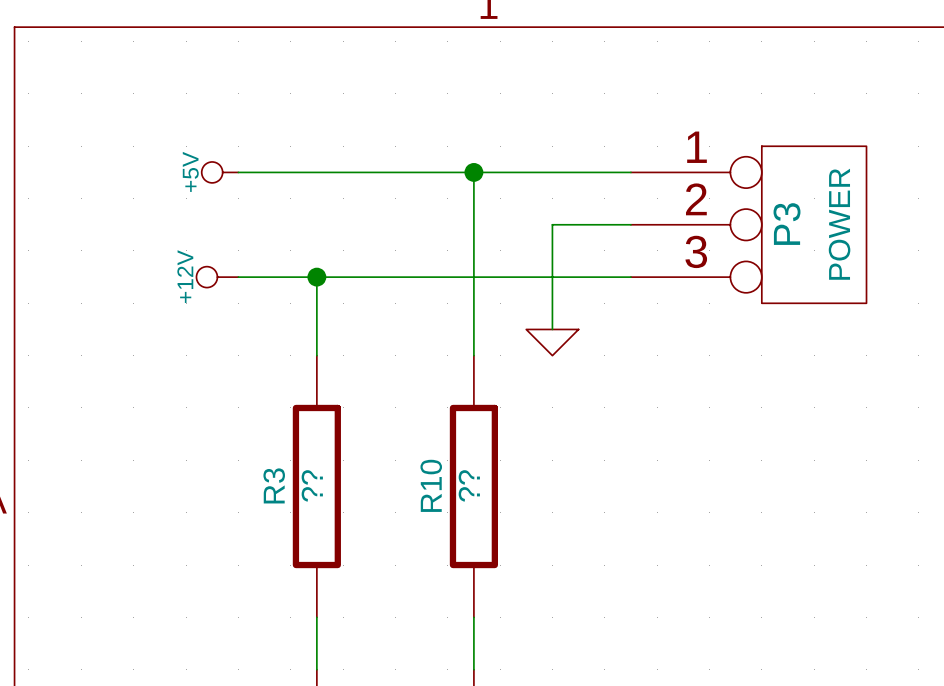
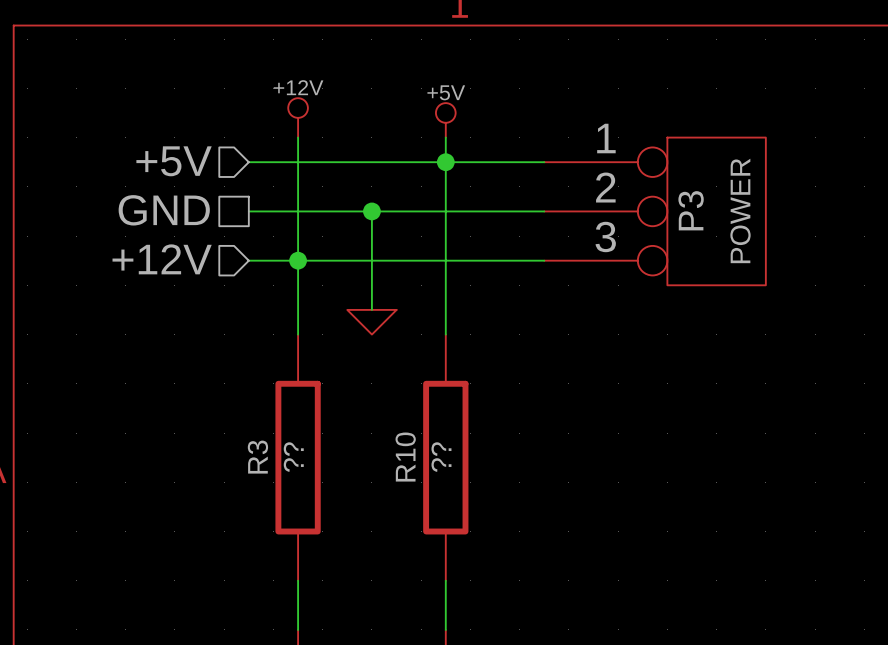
wire: none -> (298, 137) (298, 260)
wire: none -> (445, 137) (445, 162)
hierarchical label: none -> +5V (174, 161)
power symbol rotation: 0° (220, 172) -> 90° clockwise (445, 120)
power symbol position: +5V (220, 172) -> +5V (445, 120)
wire: (238, 172) (264, 172) -> none
hierarchical label: none -> GND (164, 210)
wire: none -> (371, 211) (371, 309)
junction: none -> (371, 211)
wire: (552, 224) (552, 329) -> (519, 211) (248, 211)
P3 position: (748, 224) -> (655, 211)
hierarchical label: none -> +12V (162, 259)
power symbol rotation: 0° (217, 277) -> 90° clockwise (298, 117)
power symbol position: +12V (217, 277) -> +12V (298, 117)
wire: (238, 277) (264, 277) -> none
power symbol position: (552, 342) -> (371, 322)

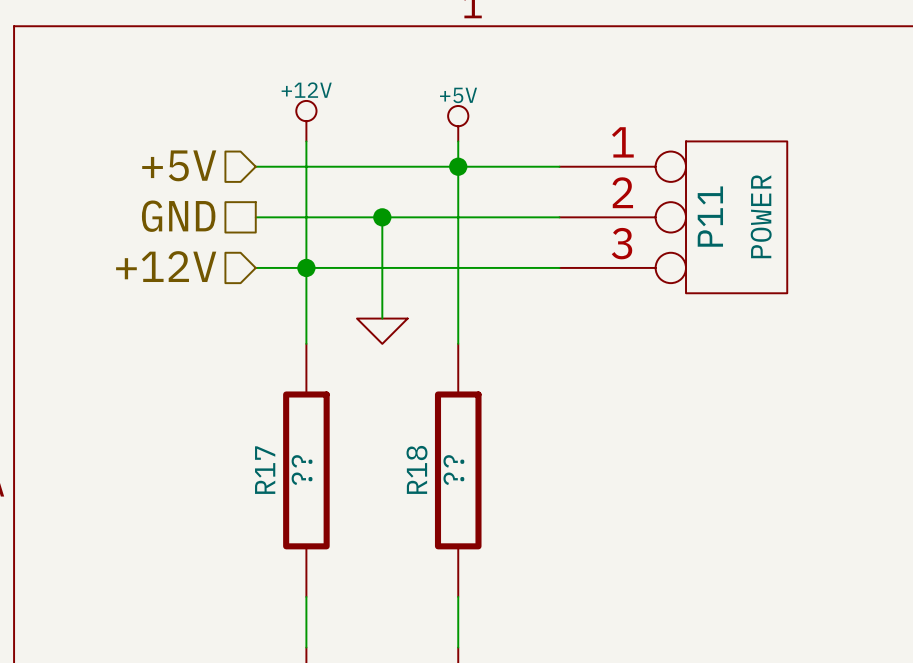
P3 name: P3 (691, 210) -> P11 (710, 216)
R3 name: R3 (257, 457) -> R17 (265, 470)
R10 name: R10 (405, 457) -> R18 (416, 469)

